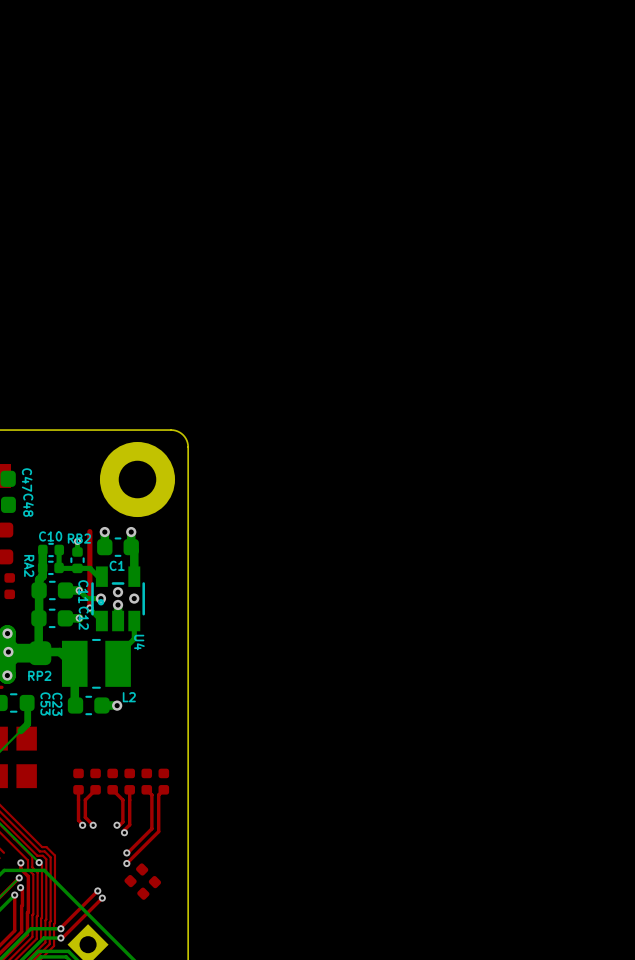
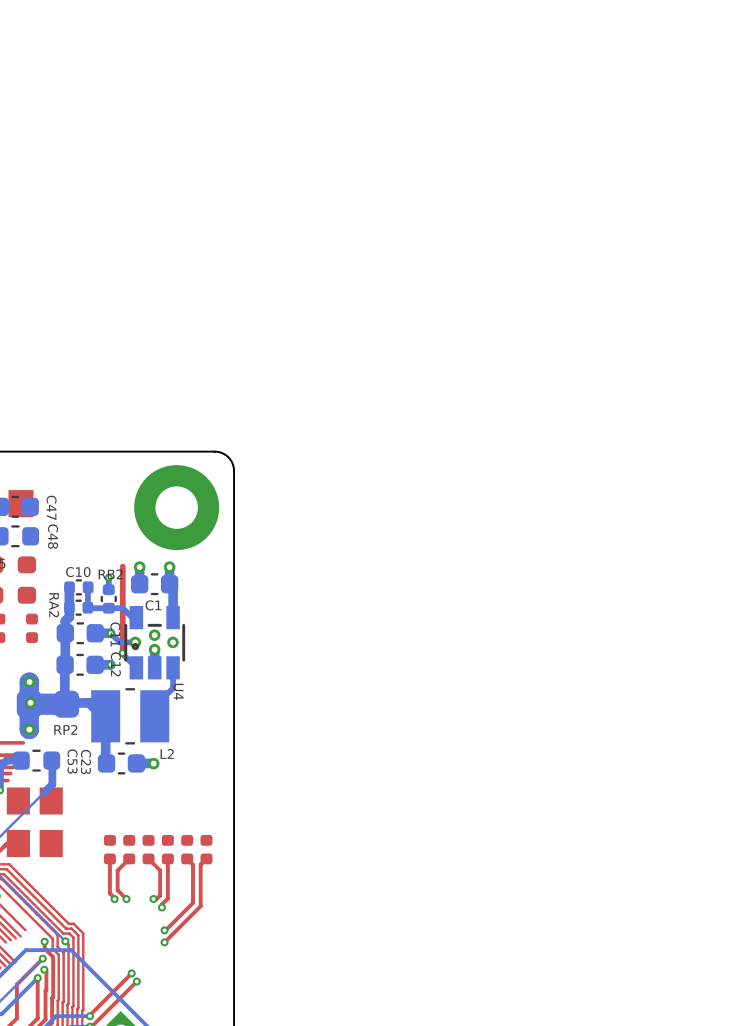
part: (136, 875) -> none
part: (149, 887) -> none

